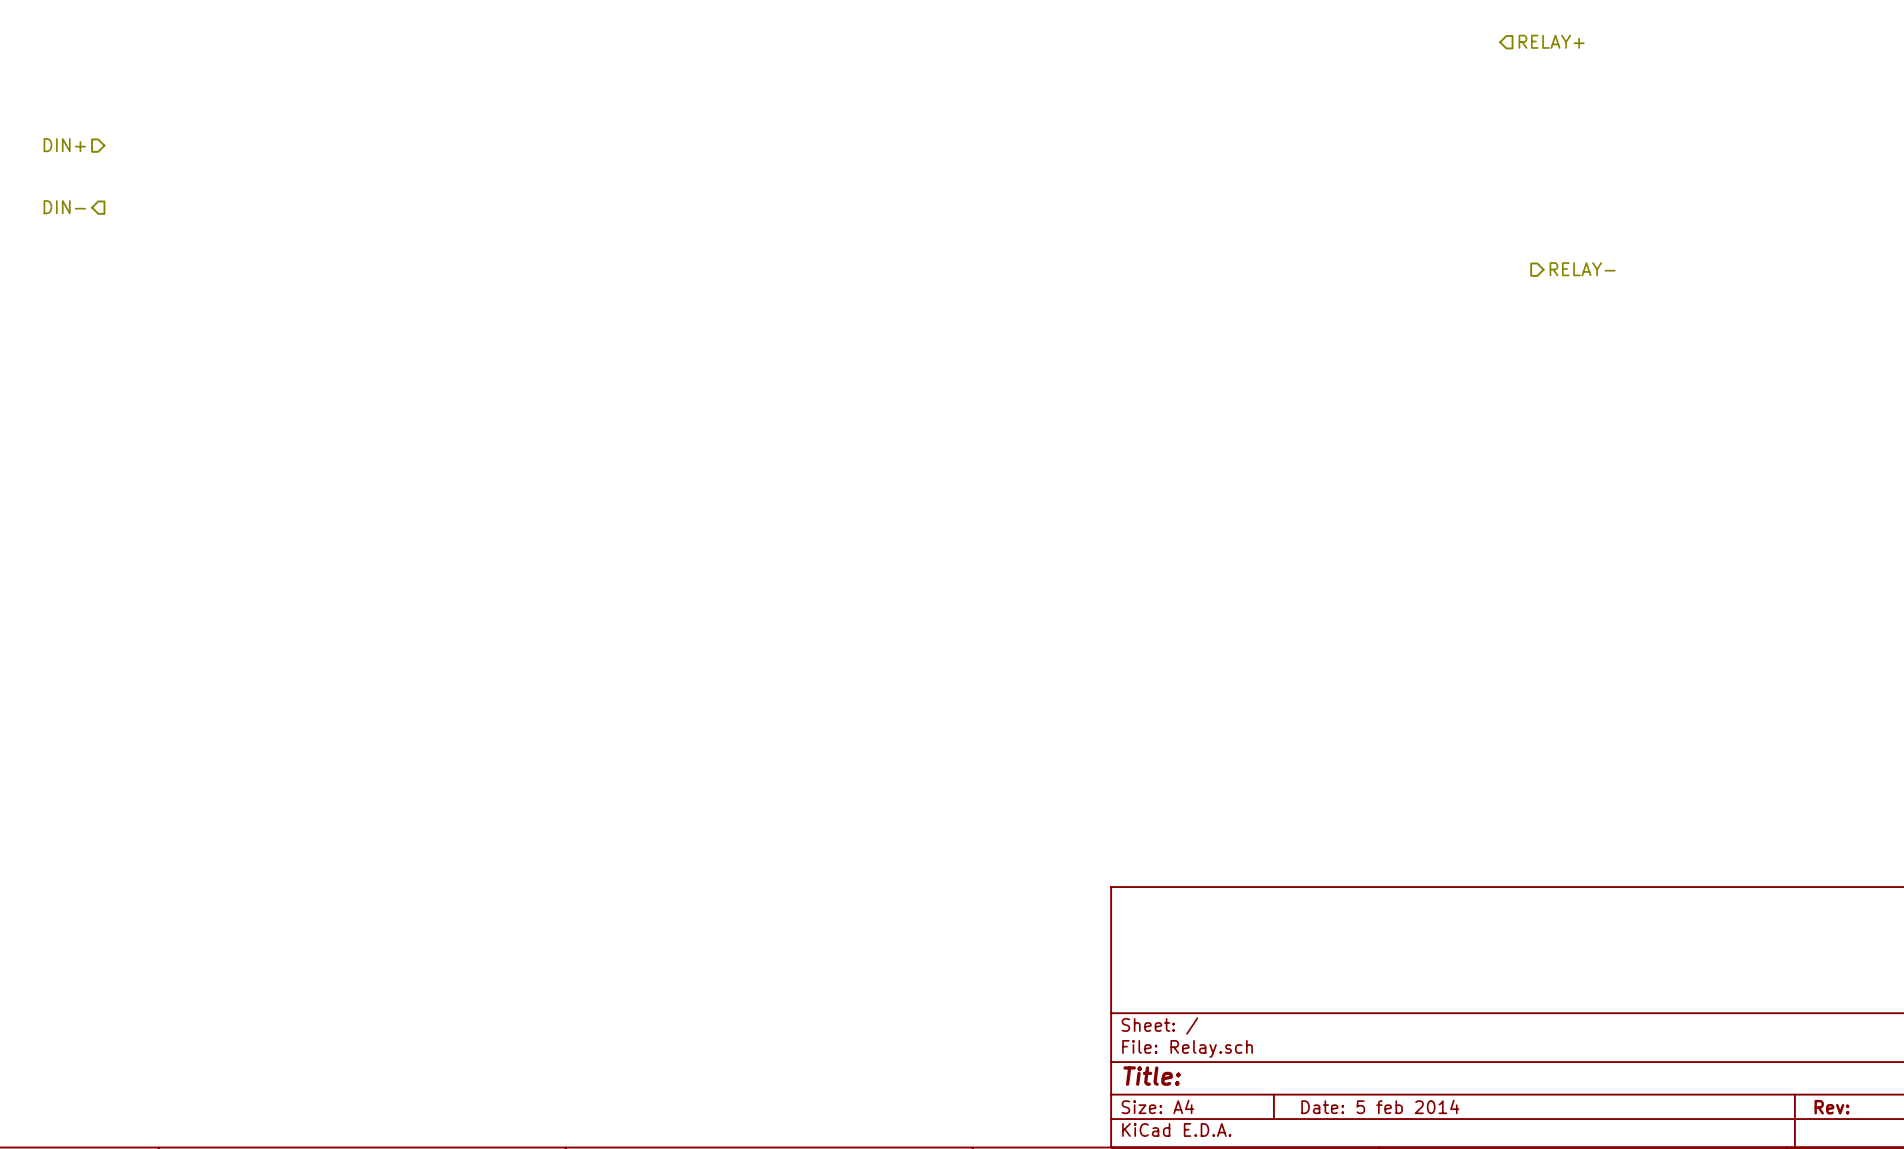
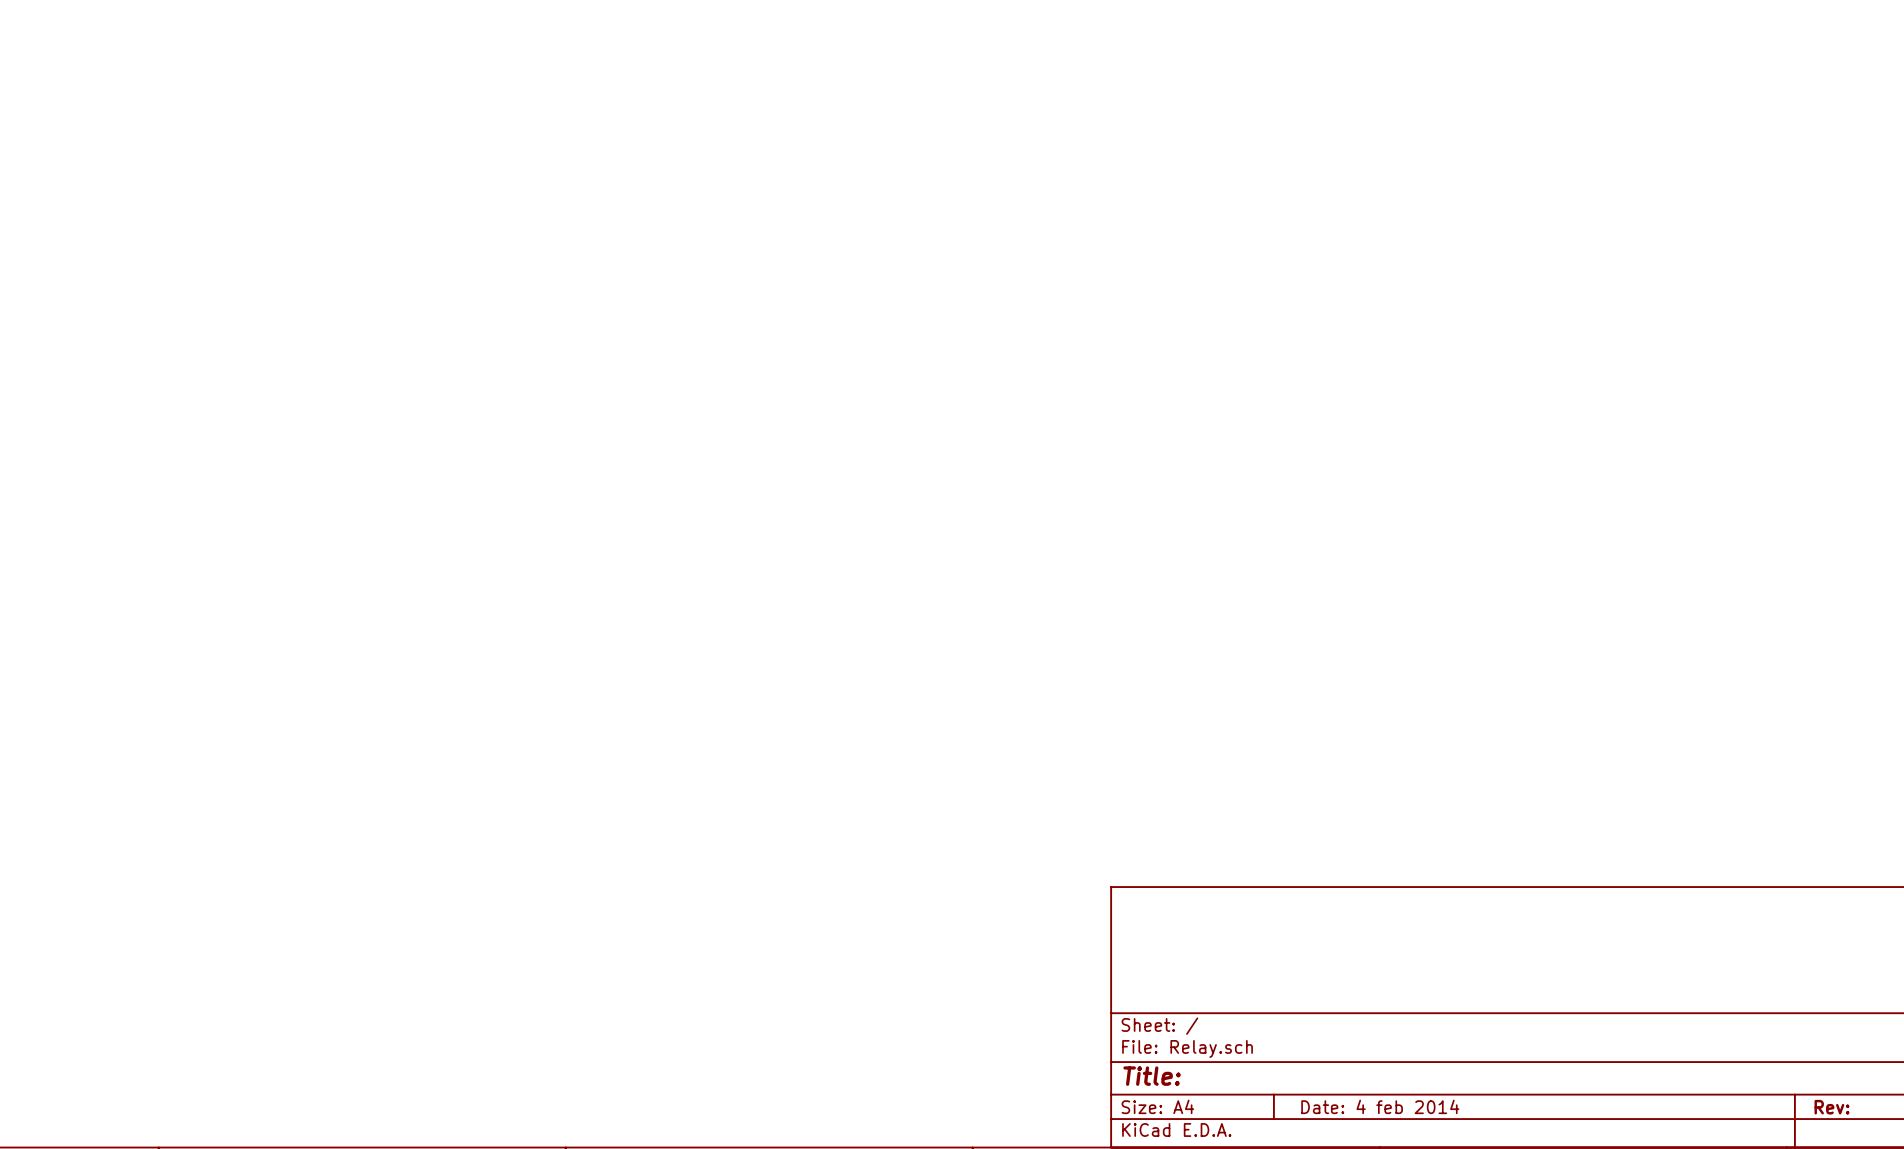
hierarchical label: RELAY+ (1551, 41) -> none
hierarchical label: DIN+ (64, 145) -> none
hierarchical label: DIN- (64, 207) -> none
hierarchical label: RELAY- (1582, 269) -> none
title block: Date: 5 feb 2014 (1380, 1106) -> Date: 4 feb 2014 (1380, 1106)

